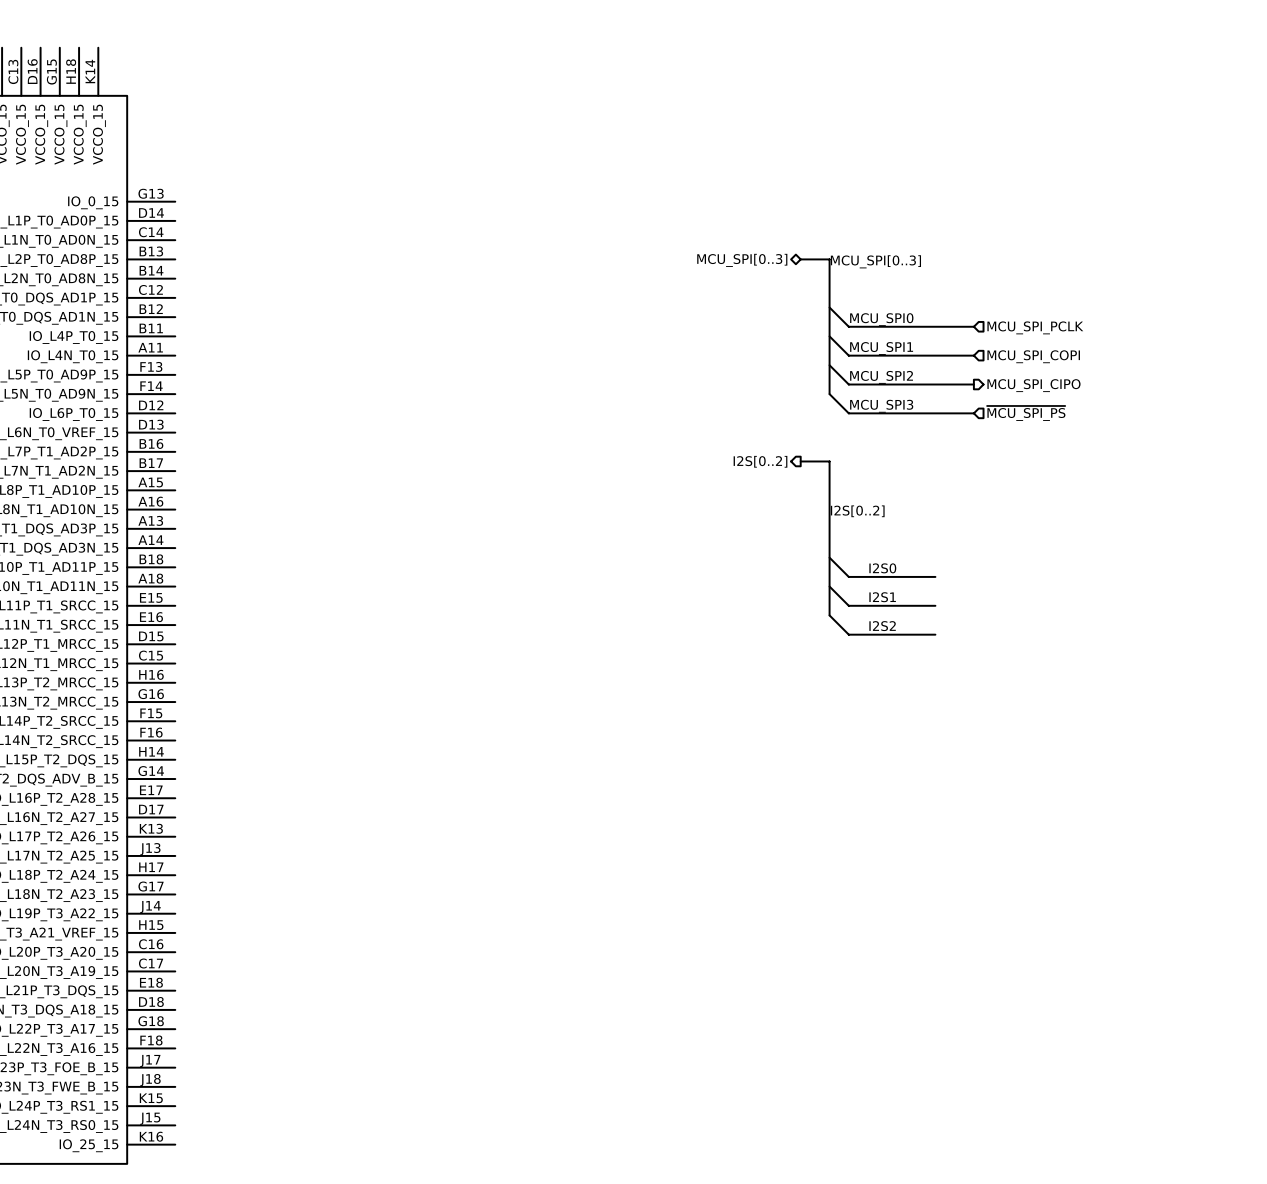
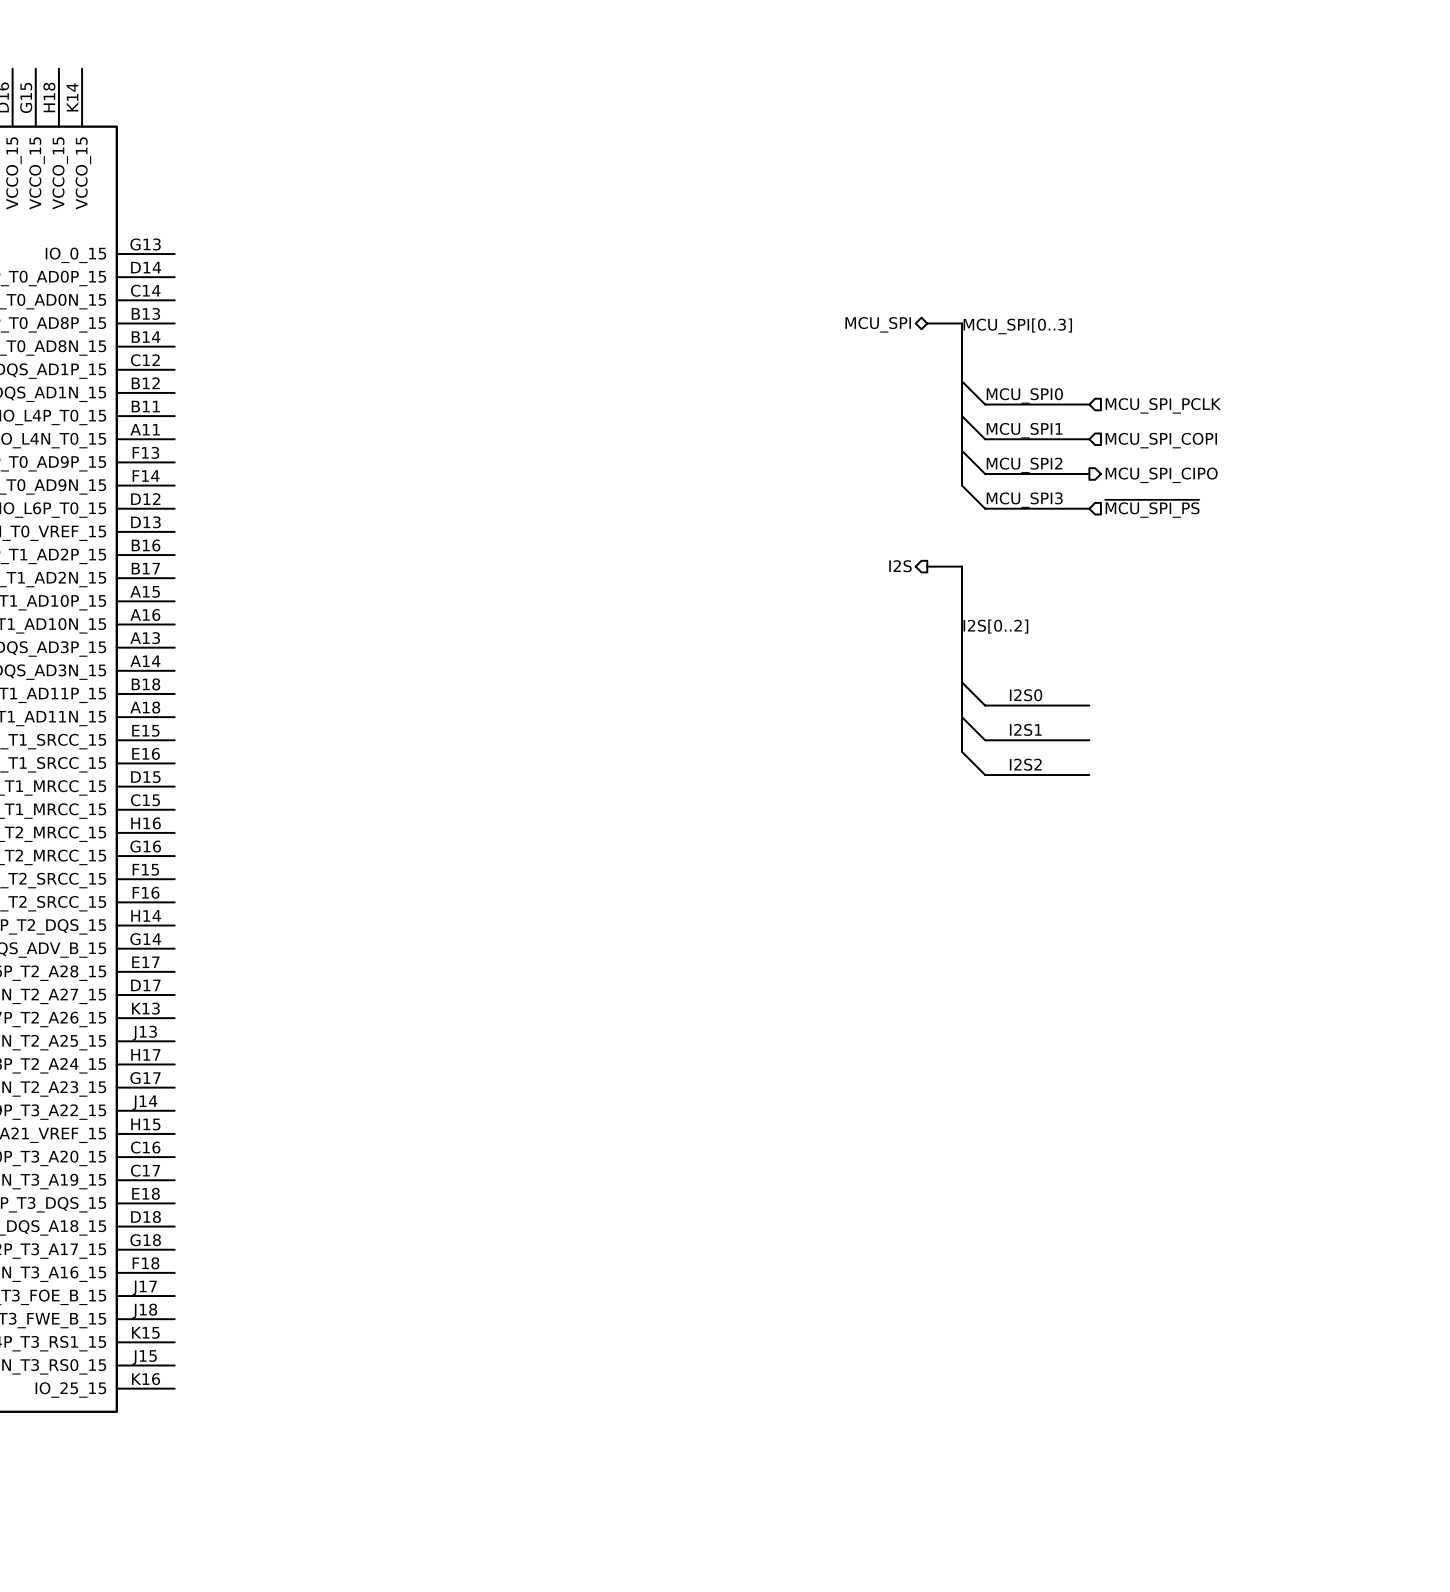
hierarchical label: MCU_SPI[0..3] (742, 260) -> MCU_SPI (878, 324)
wire: (935, 326) (973, 326) -> none
hierarchical label position: MCU_SPI_PCLK (1035, 327) -> MCU_SPI_PCLK (1163, 405)
wire: (935, 355) (973, 355) -> none
hierarchical label position: MCU_SPI_COPI (1033, 356) -> MCU_SPI_COPI (1161, 440)
wire: (935, 384) (973, 384) -> none
hierarchical label position: MCU_SPI_CIPO (1033, 385) -> MCU_SPI_CIPO (1161, 475)
wire: (935, 413) (973, 413) -> none
hierarchical label position: ~{MCU_SPI_PS} (1026, 413) -> ~{MCU_SPI_PS} (1152, 508)
hierarchical label: I2S[0..2] (760, 461) -> I2S (900, 566)

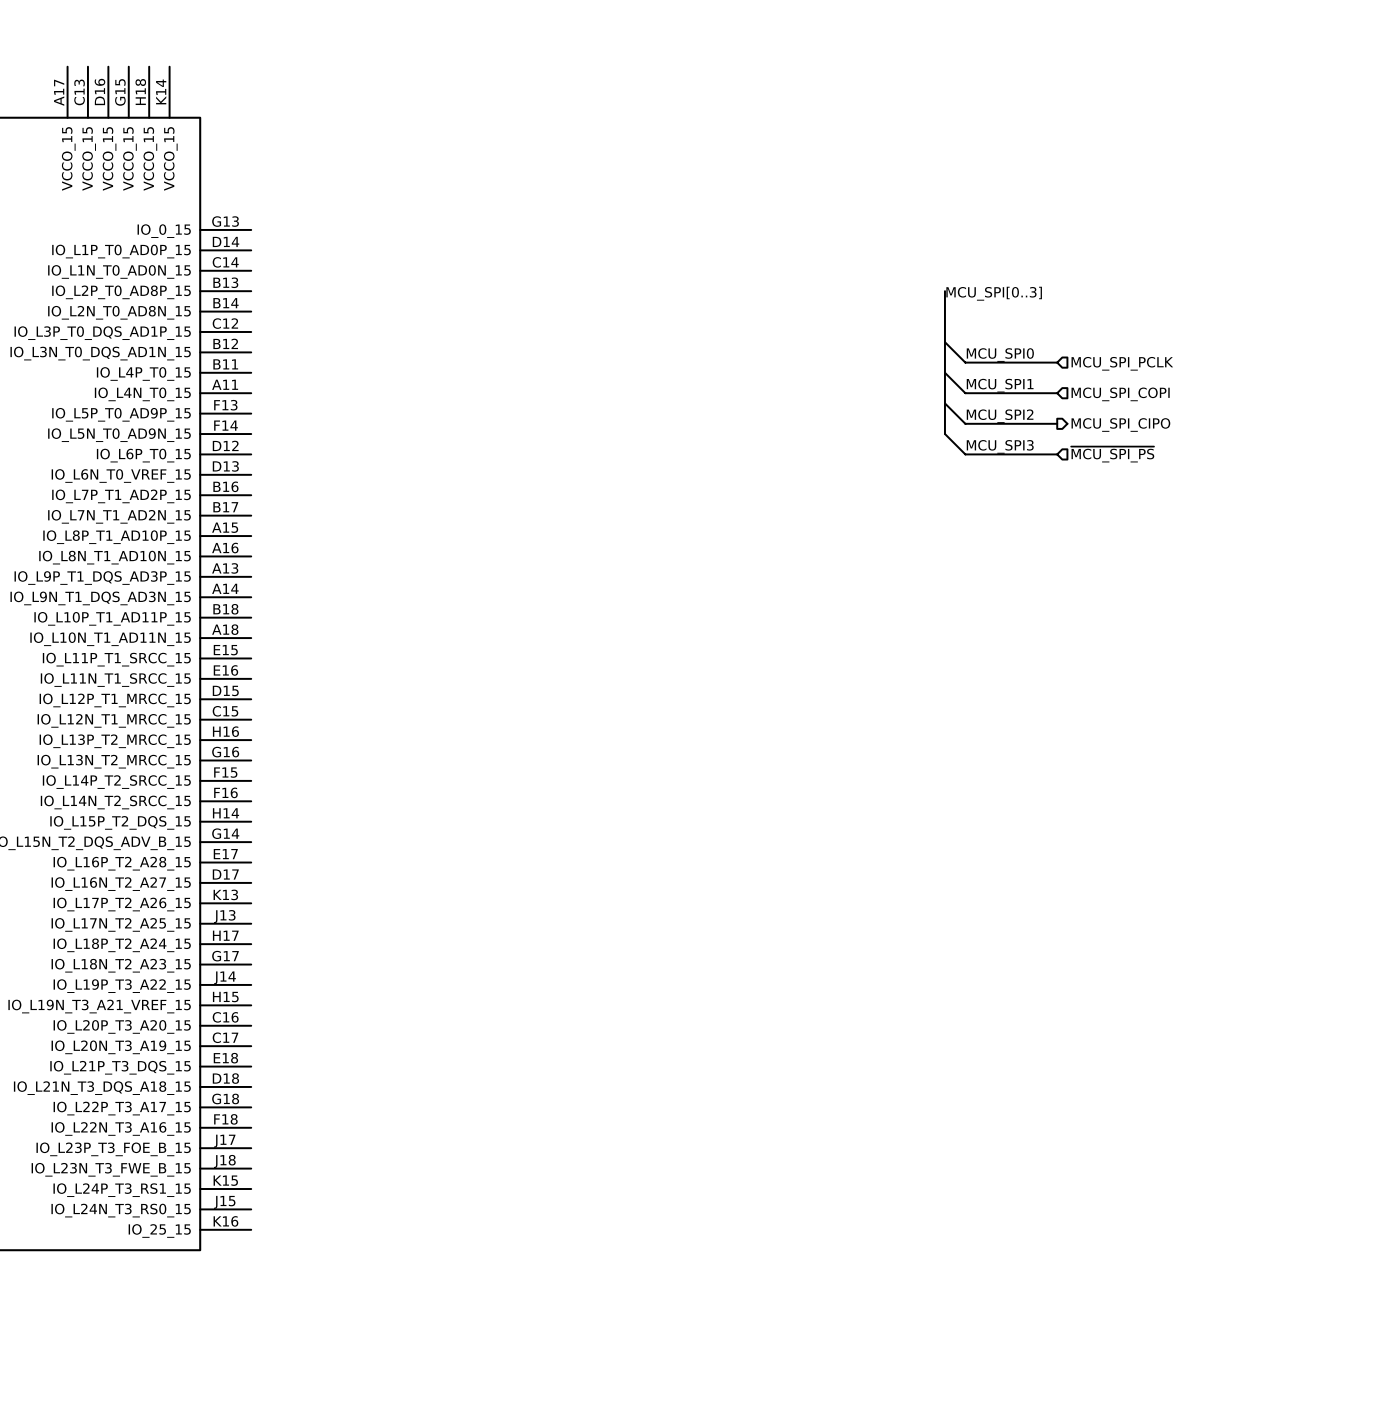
bus: (927, 323) (962, 323) -> none
hierarchical label: MCU_SPI (878, 324) -> none
hierarchical label: I2S (900, 566) -> none
bus: (927, 566) (962, 566) (962, 751) -> none
label: I2S[0..2] (995, 626) -> none
wire: (962, 682) (985, 705) (1089, 705) -> none
label: I2S0 (1026, 695) -> none
wire: (962, 717) (985, 740) (1089, 740) -> none
label: I2S1 (1025, 729) -> none
wire: (962, 751) (985, 775) (1089, 775) -> none
label: I2S2 (1025, 764) -> none

